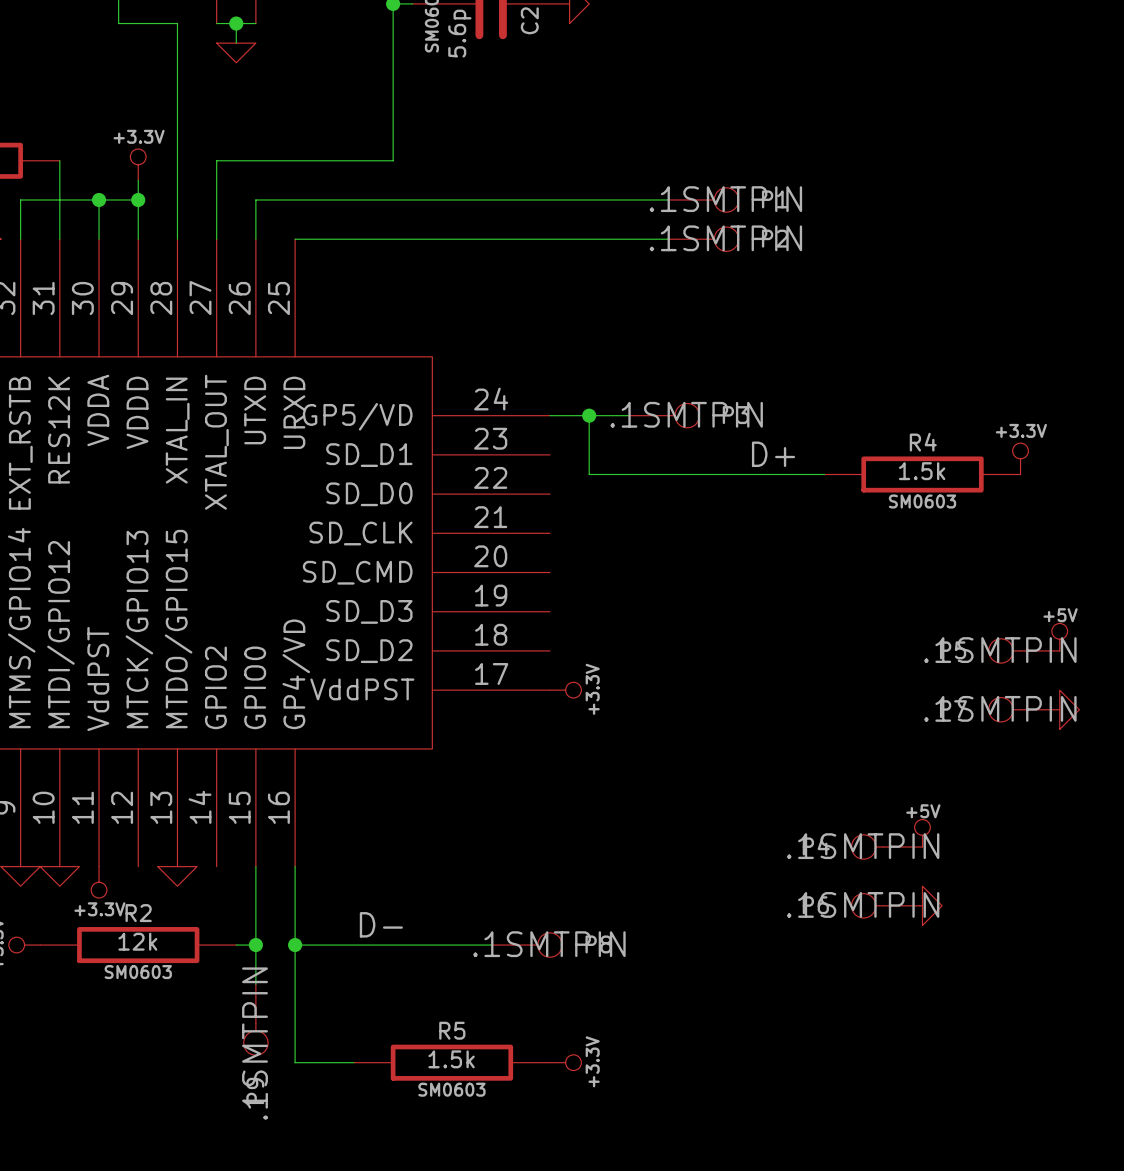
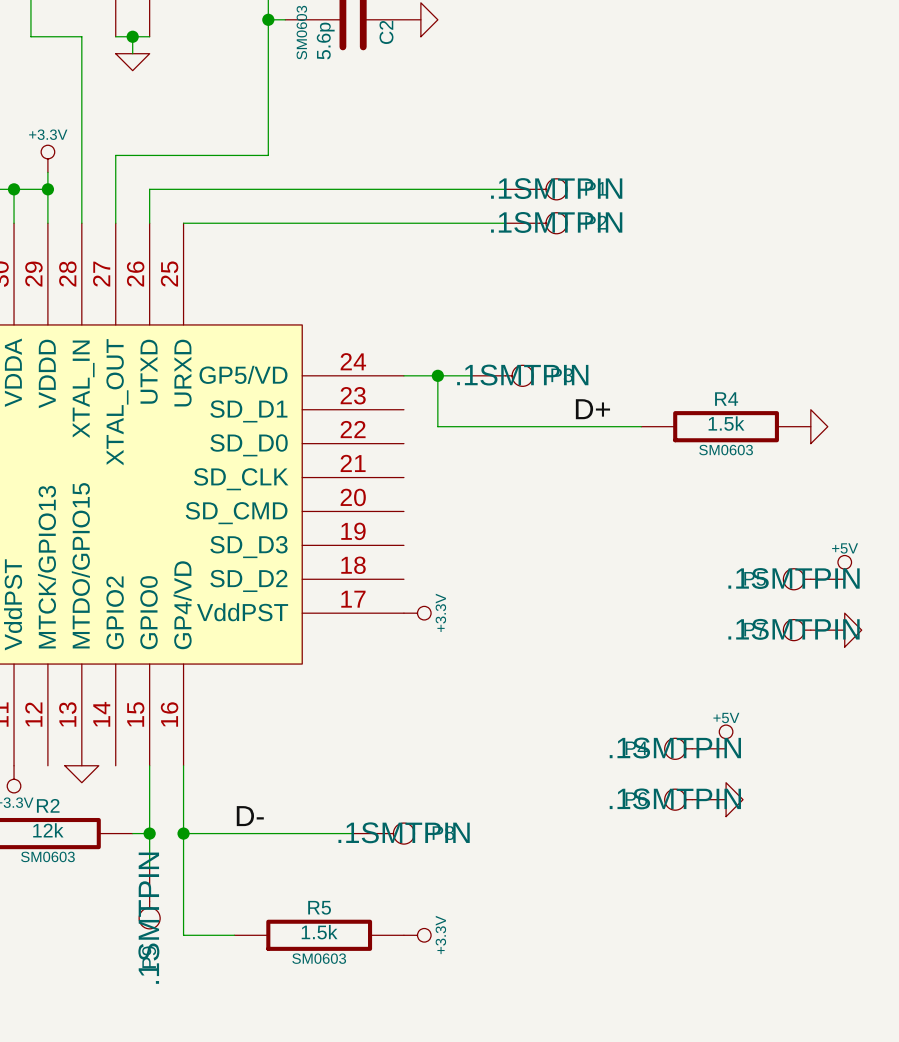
power symbol: +3.3V (1020, 458) -> none
power symbol: none -> (819, 426)

